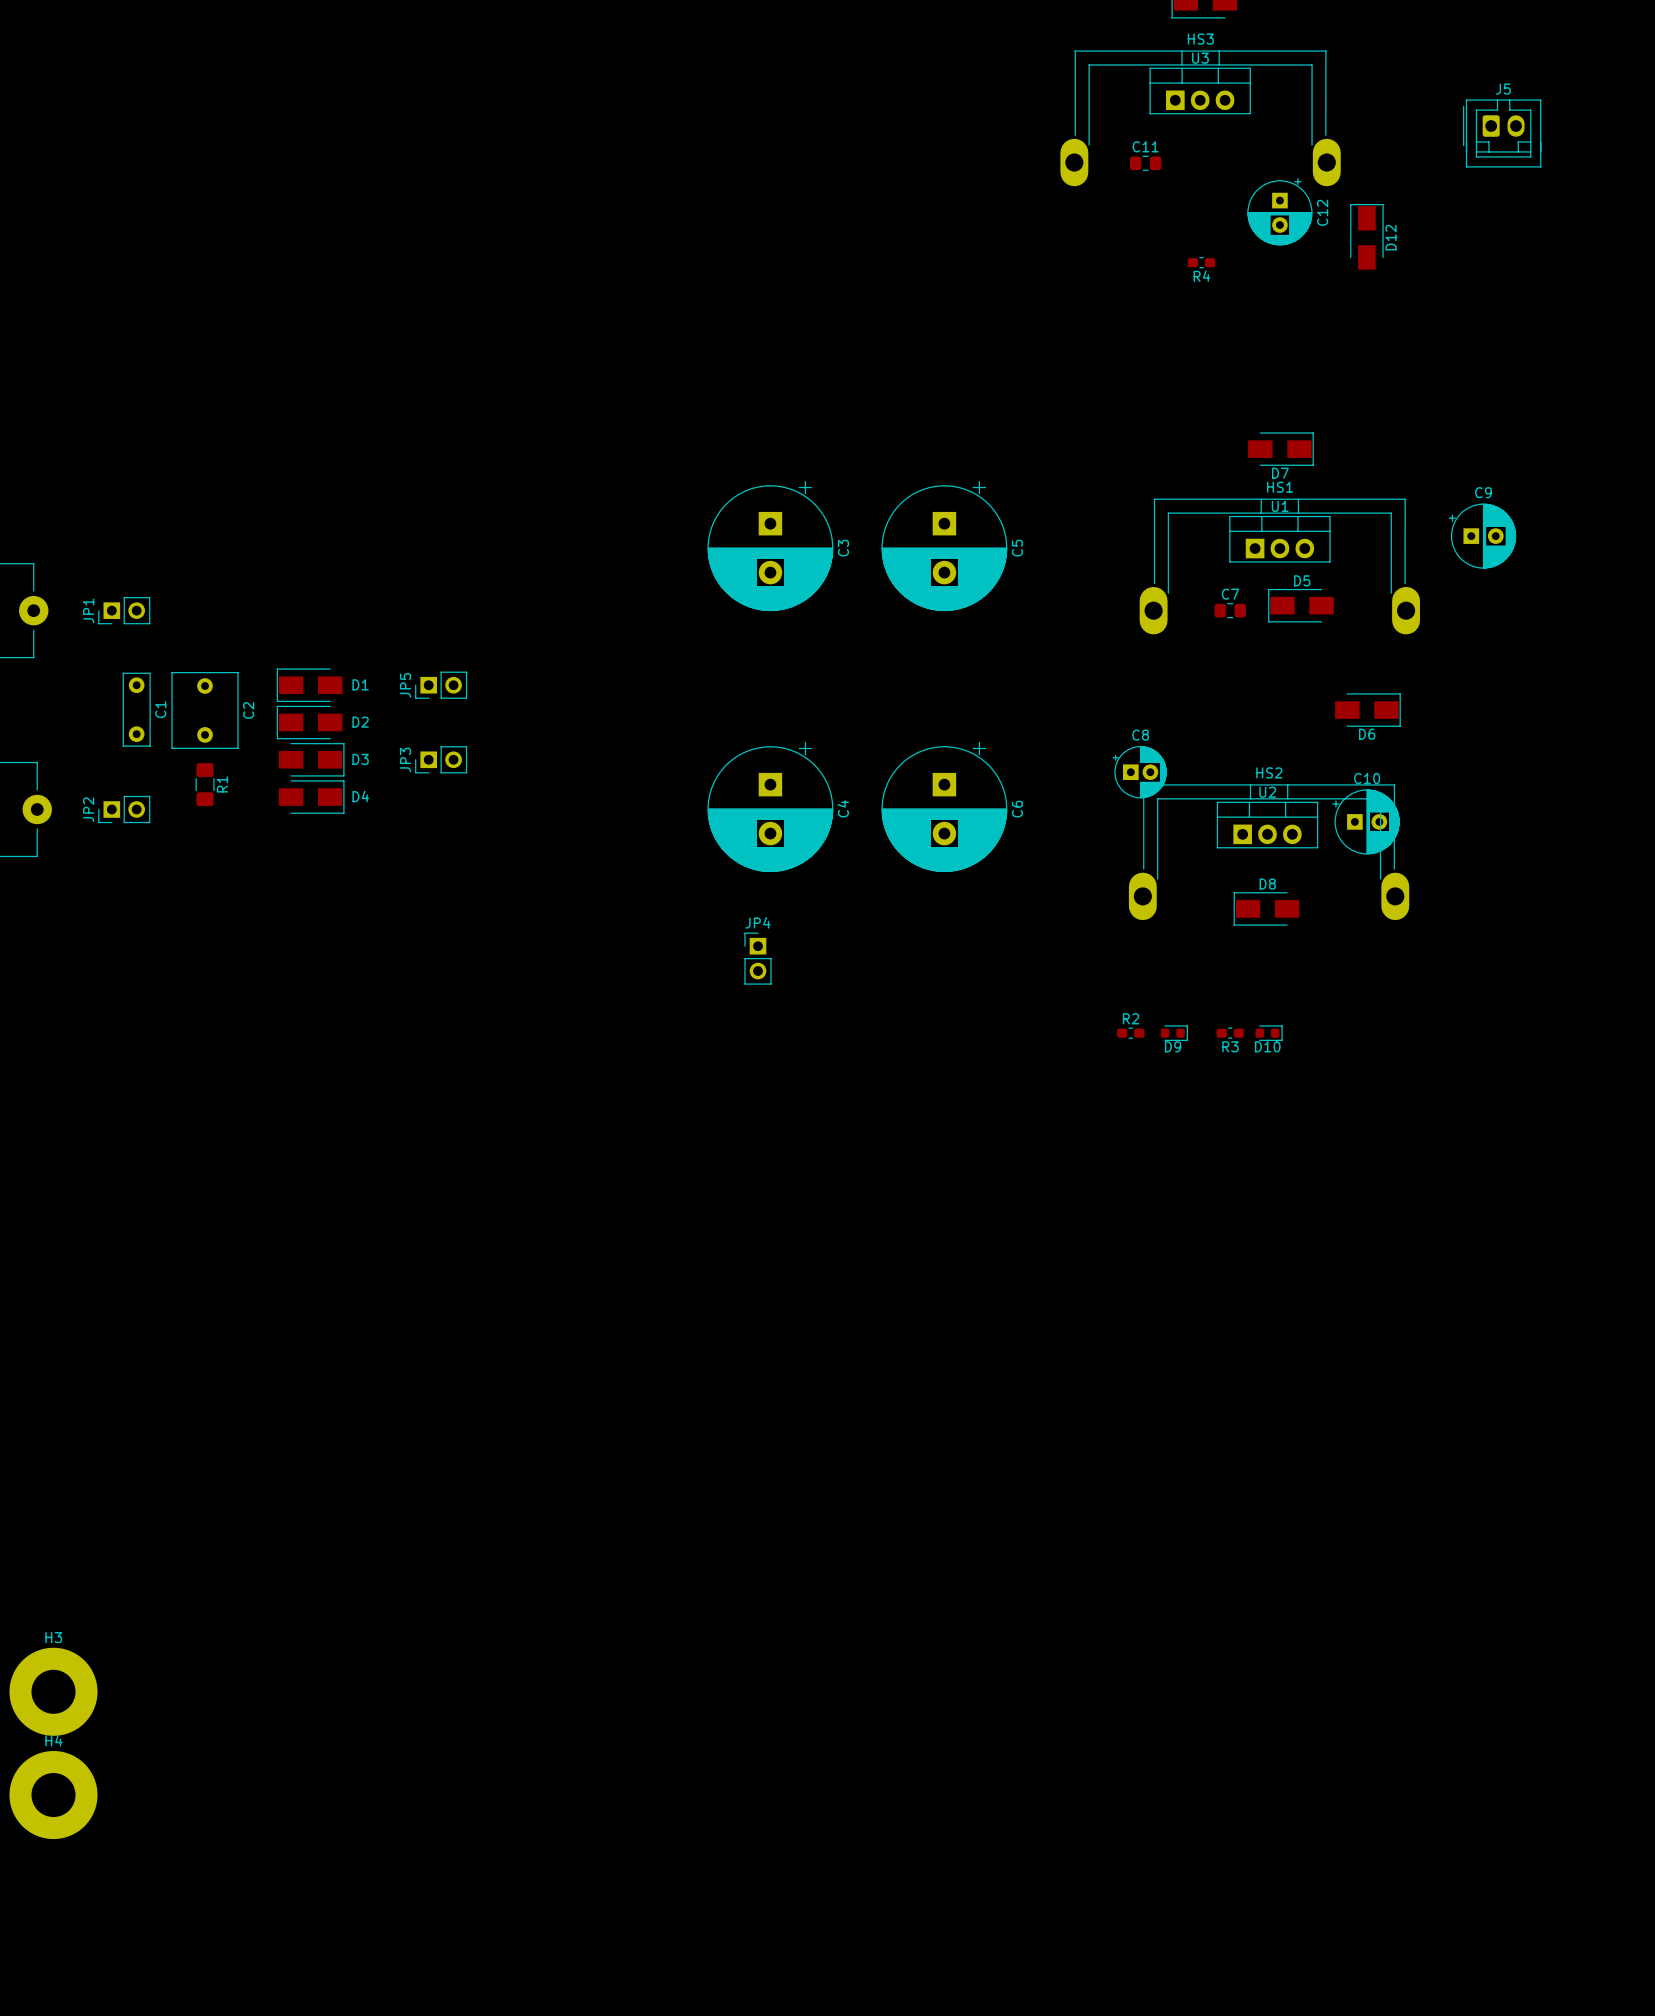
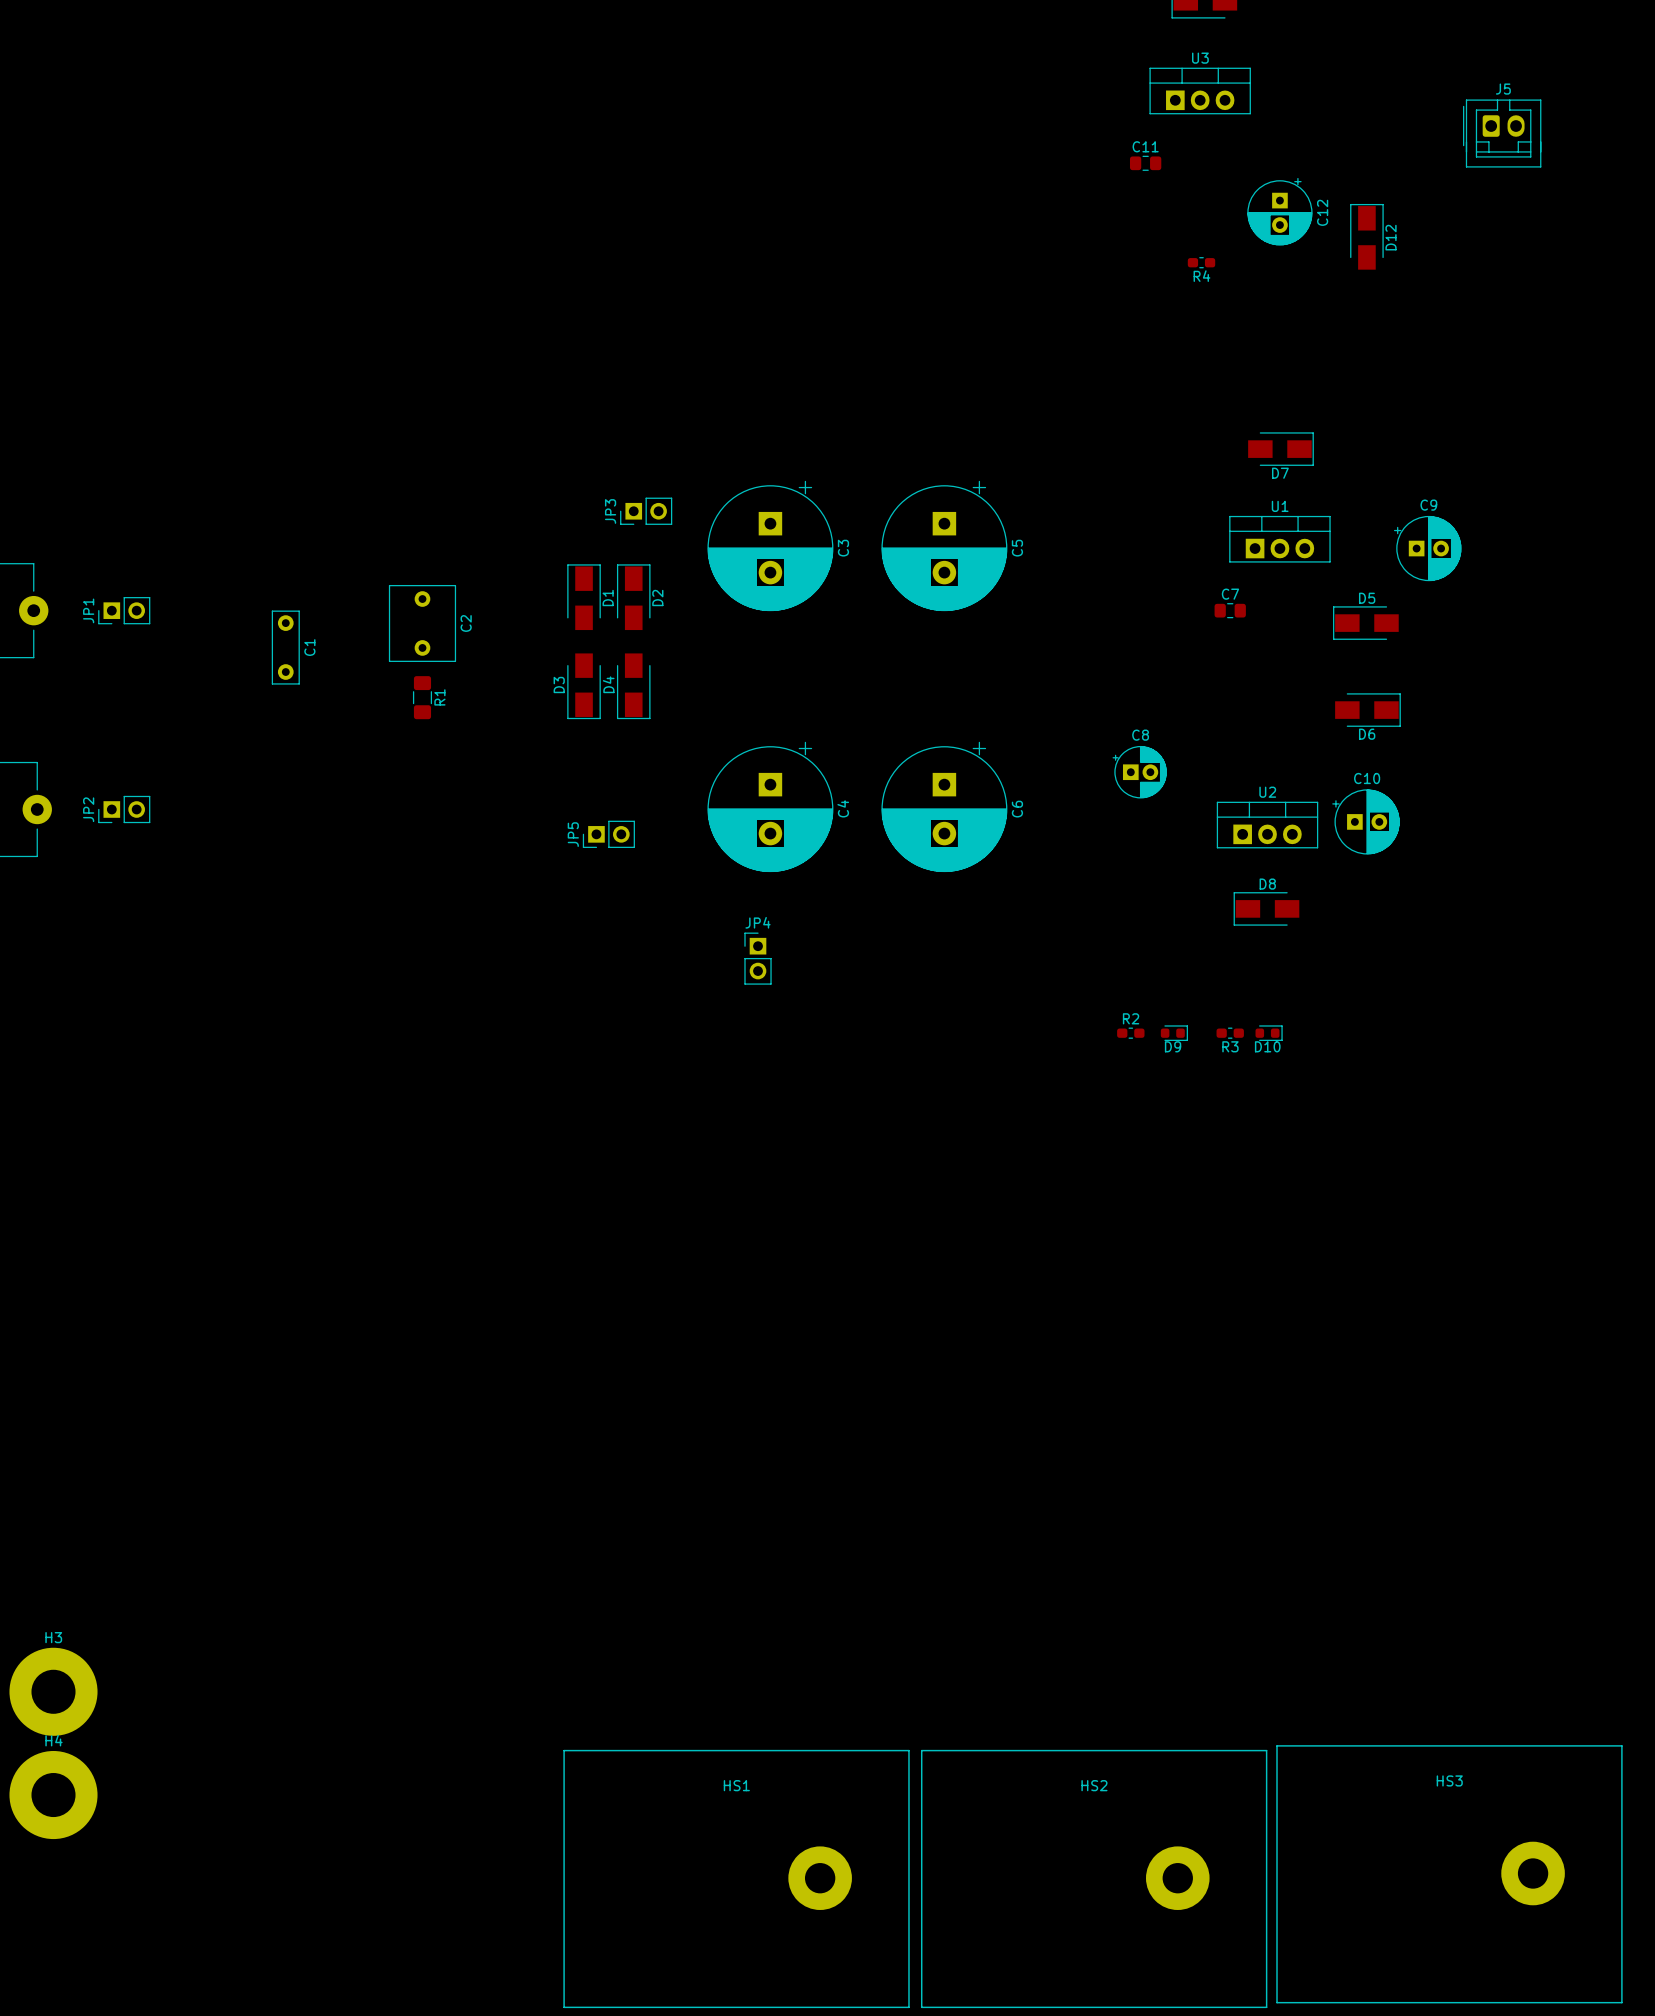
HS3 footprint: [1060, 50, 1341, 187] -> [1276, 1745, 1623, 2004]
HS1 footprint: [1139, 498, 1421, 635] -> [563, 1749, 910, 2009]
C9 position: (1482, 536) -> (1427, 548)
D5 position: (1300, 605) -> (1365, 623)
D1 name position: D1 (360, 684) -> D1 (608, 598)
D1 rotation: 0° (309, 685) -> 90° clockwise (584, 597)
D1 position: (309, 685) -> (584, 597)
JP5 position: (441, 685) -> (608, 834)
C1 position: (136, 709) -> (285, 647)
C2 position: (205, 710) -> (422, 623)
D2 rotation: 0° (309, 722) -> 90° clockwise (633, 597)
D2 position: (309, 722) -> (633, 597)
D2 name position: D2 (360, 722) -> D2 (657, 598)
D3 rotation: 0° (311, 759) -> 90° clockwise (584, 686)
D3 position: (311, 759) -> (584, 686)
D3 name position: D3 (360, 759) -> D3 (559, 684)
JP3 position: (441, 759) -> (646, 511)
R1 position: (205, 784) -> (422, 697)
HS2 footprint: [1128, 784, 1410, 921] -> [920, 1749, 1268, 2009]
D4 name position: D4 (360, 796) -> D4 (608, 684)
D4 rotation: 0° (311, 797) -> 90° clockwise (633, 686)
D4 position: (311, 797) -> (633, 686)

